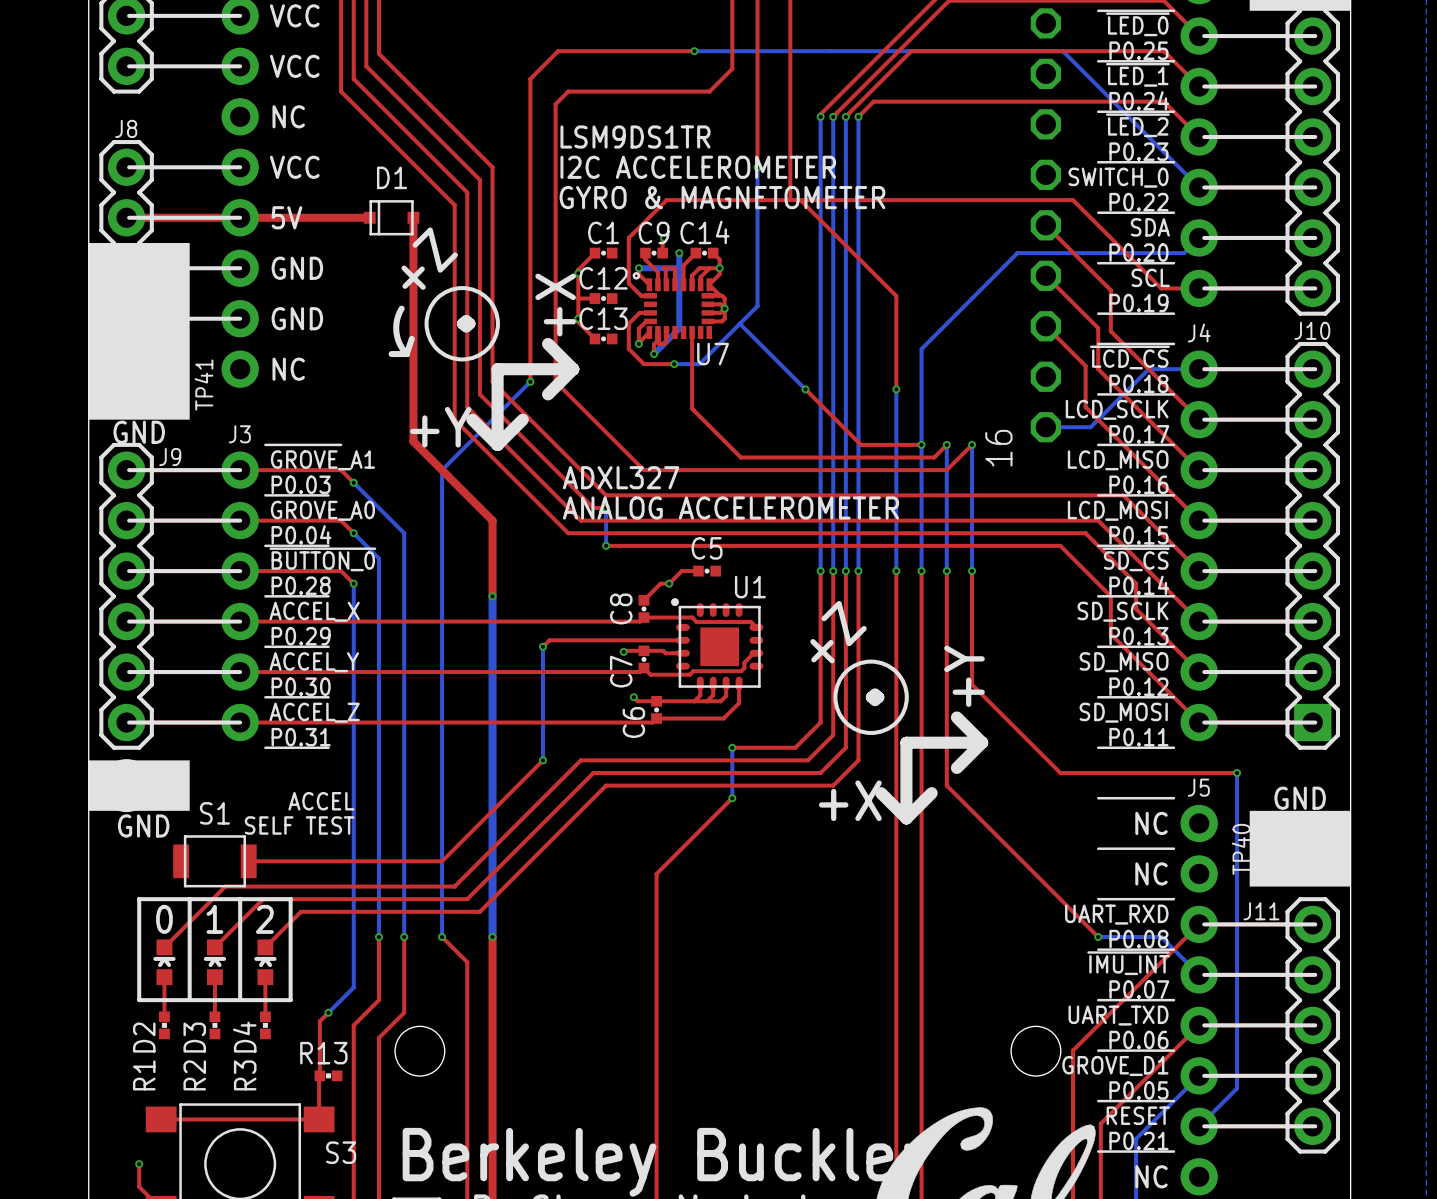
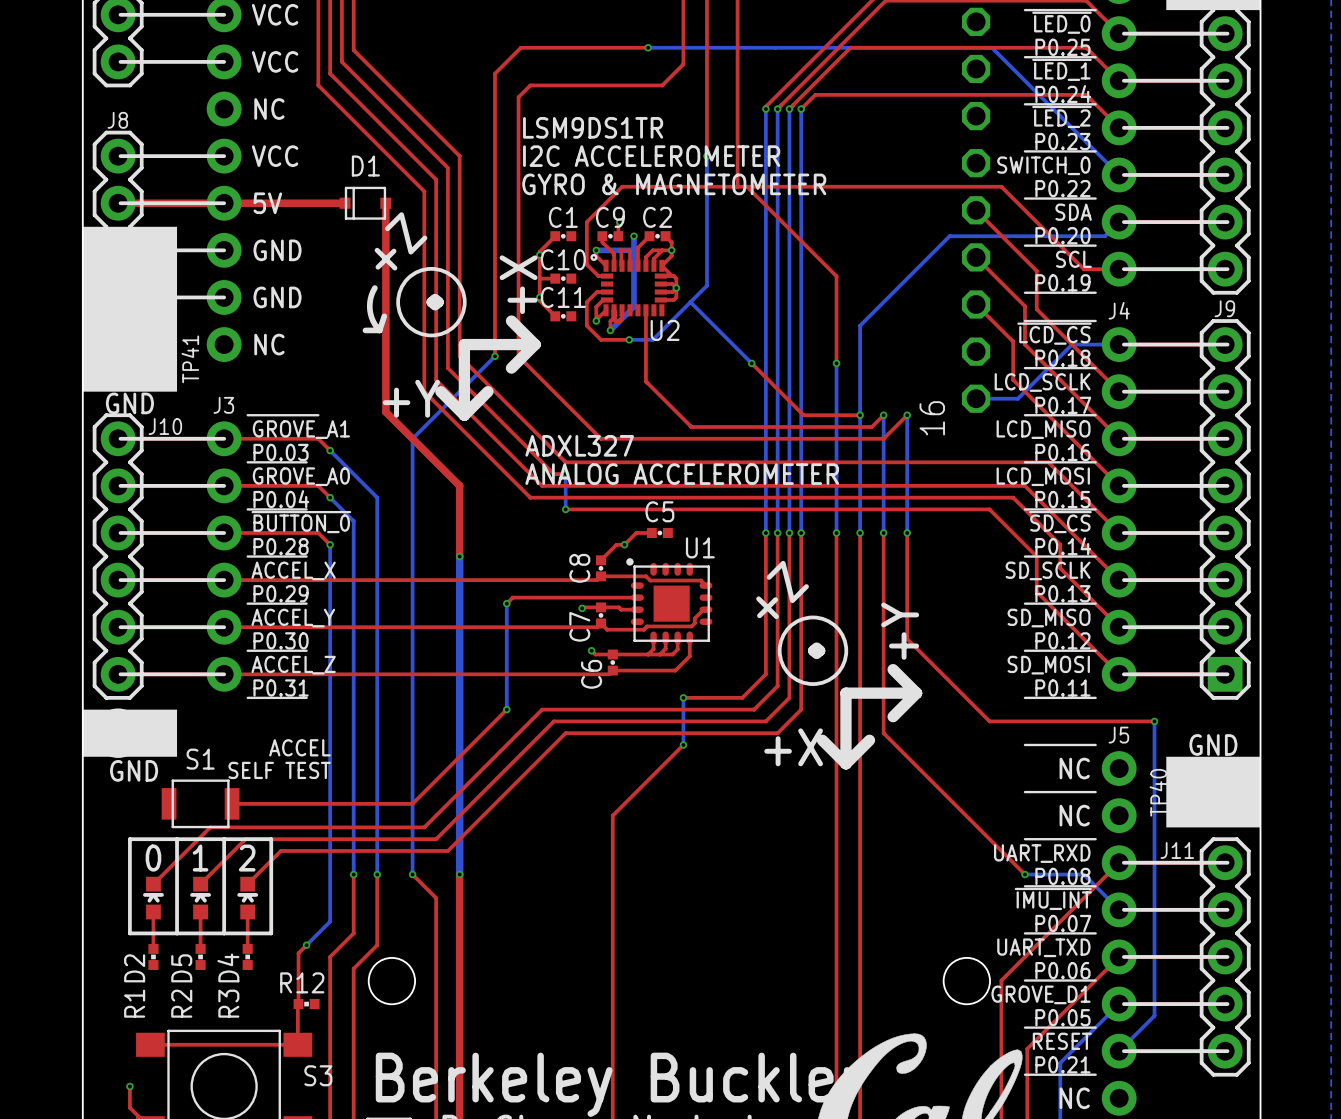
C14 name: C14 (704, 232) -> C2 (657, 217)
C12 name: C12 (603, 278) -> C10 (563, 259)
C13 name: C13 (603, 318) -> C11 (563, 297)
J10 name: J10 (1312, 330) -> J9 (1224, 308)
U7 name: U7 (713, 354) -> U2 (665, 330)
J9 name: J9 (170, 457) -> J10 (165, 426)
D3 name: D3 (194, 1037) -> D5 (181, 968)
R13 name: R13 (323, 1053) -> R12 (302, 982)

